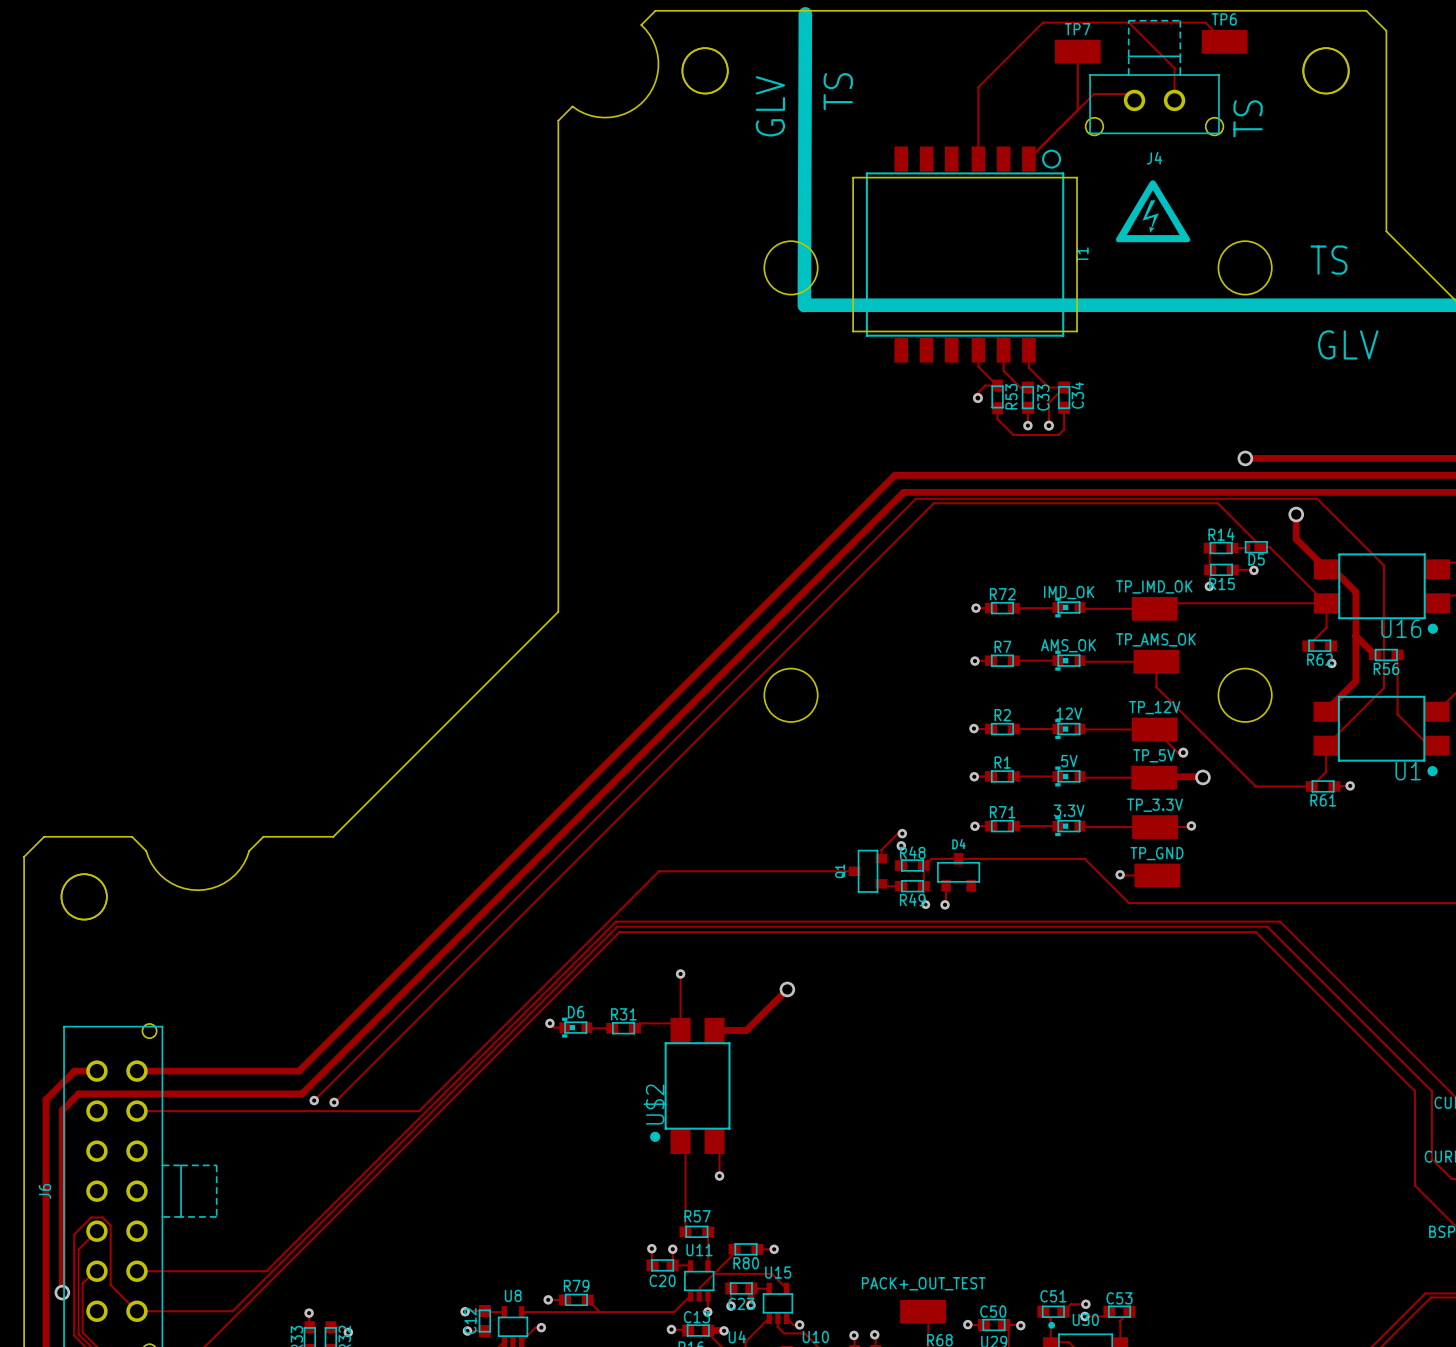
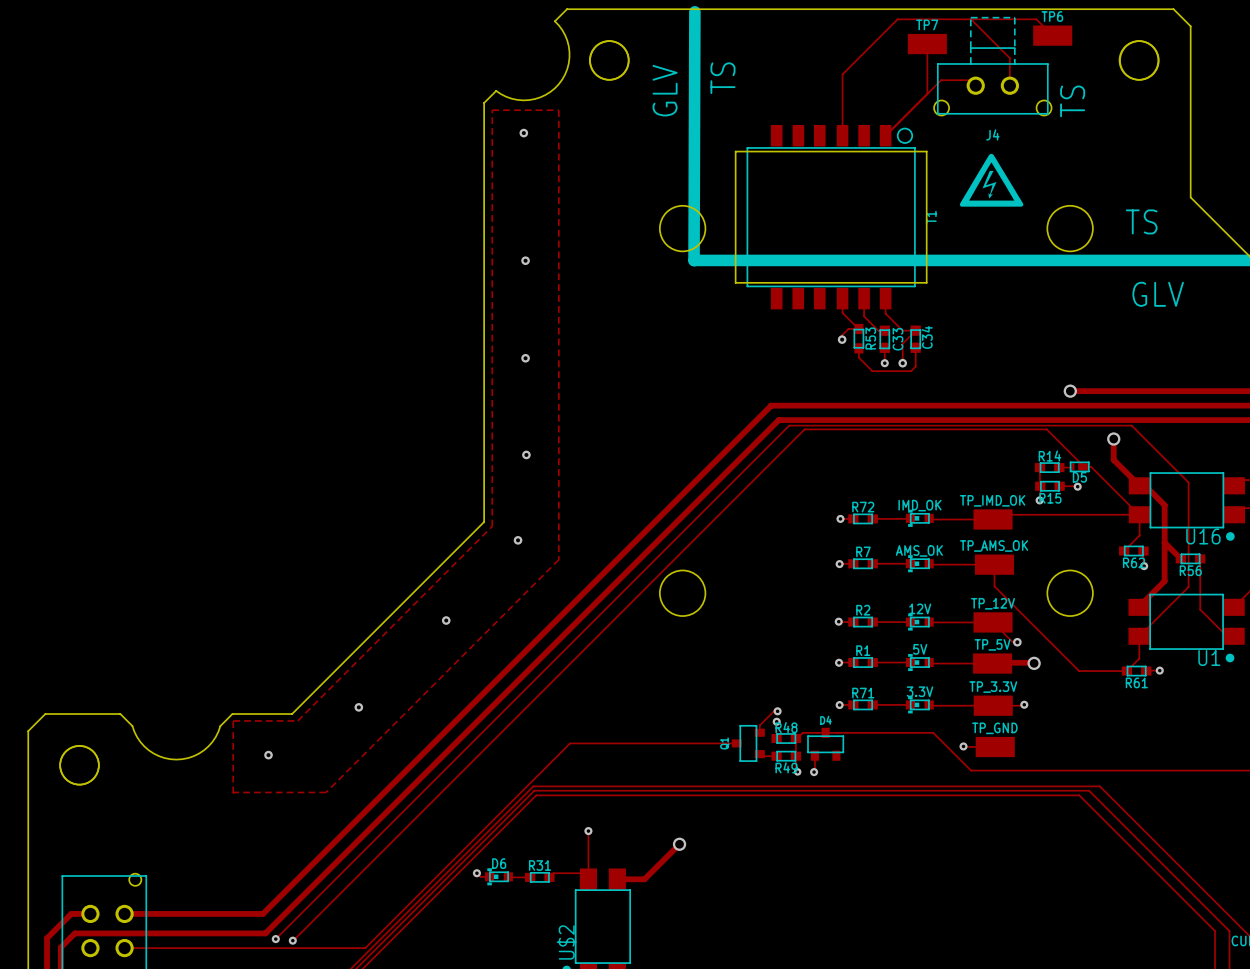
zone outline: none -> (492, 110) (492, 526) (297, 720) (233, 720) (233, 793) (326, 792) (558, 559) (558, 110) (492, 110)
via: none -> (523, 133)
via: none -> (525, 260)
via: none -> (525, 358)
via: none -> (526, 454)
via: none -> (518, 540)
via: none -> (446, 620)
via: none -> (358, 707)
via: none -> (268, 755)

